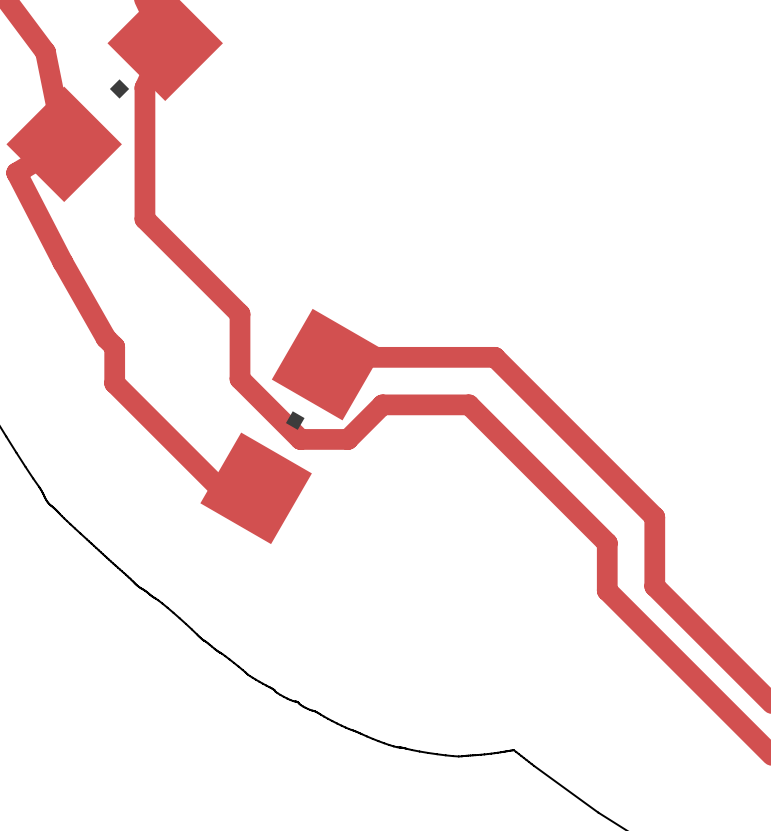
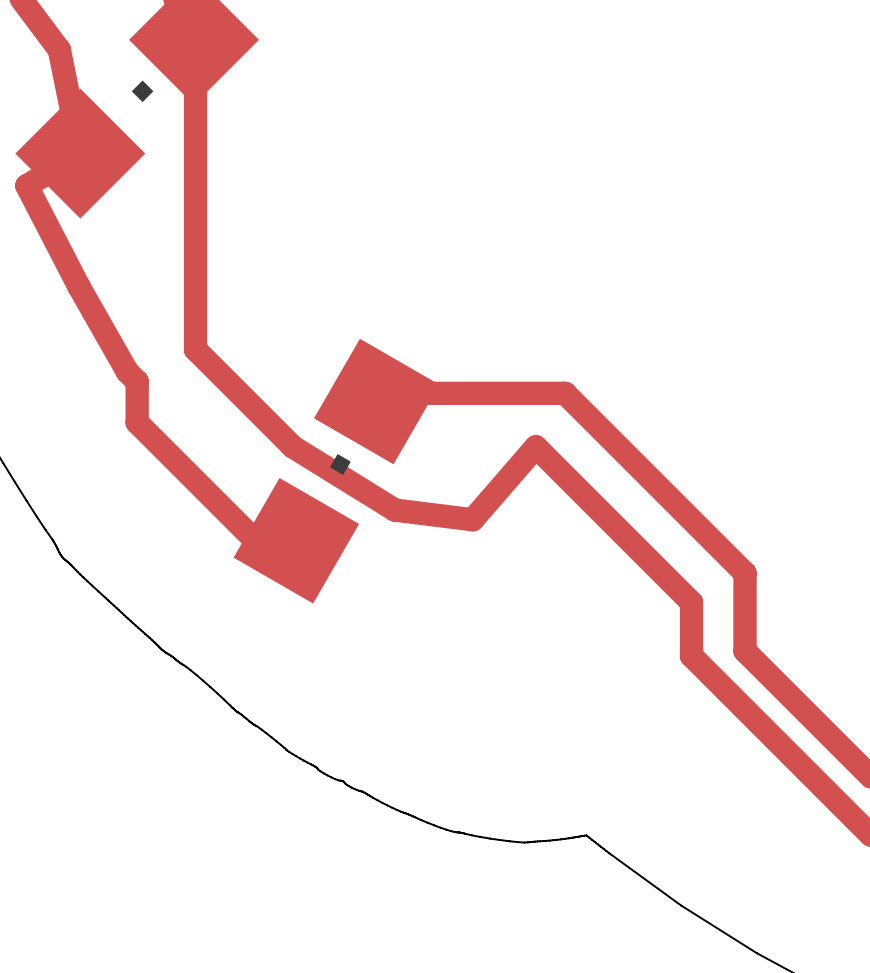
track: (165, 43) (144, 87) (144, 219) (240, 314) (240, 378) (300, 439) (348, 439) (382, 404) (468, 404) -> (195, 39) (195, 349) (292, 446) (394, 510) (472, 519) (535, 446)

